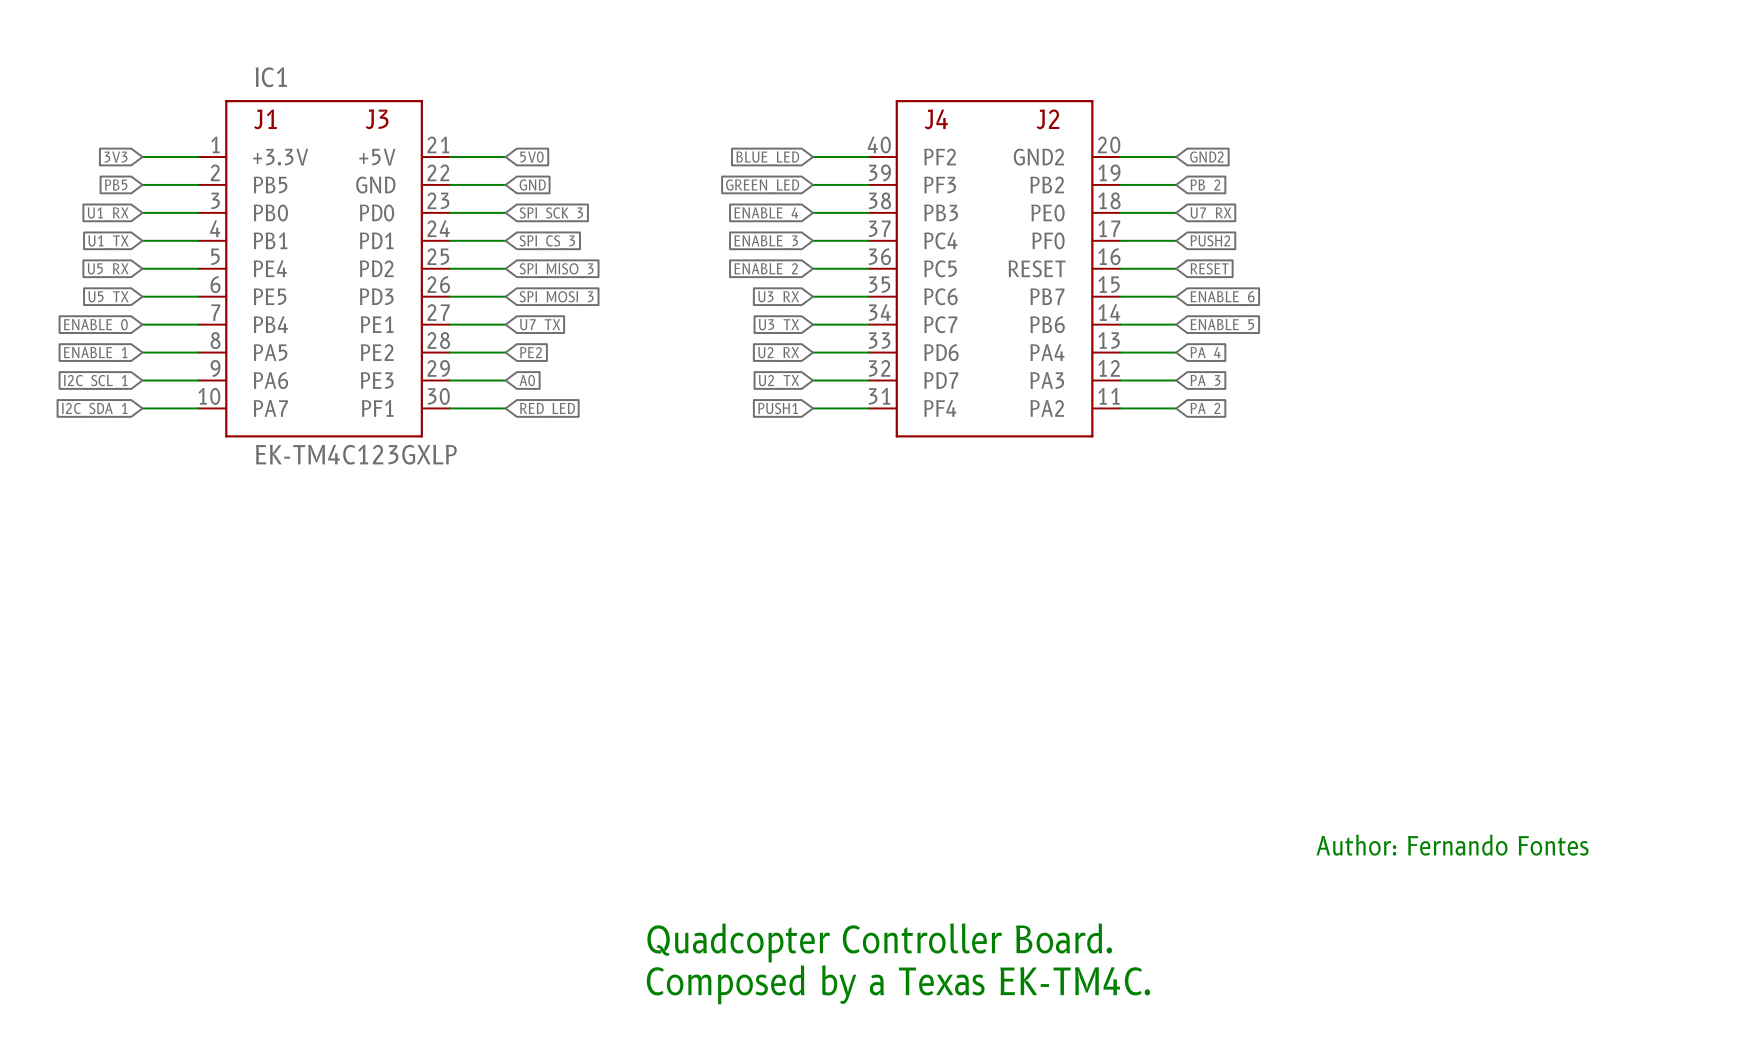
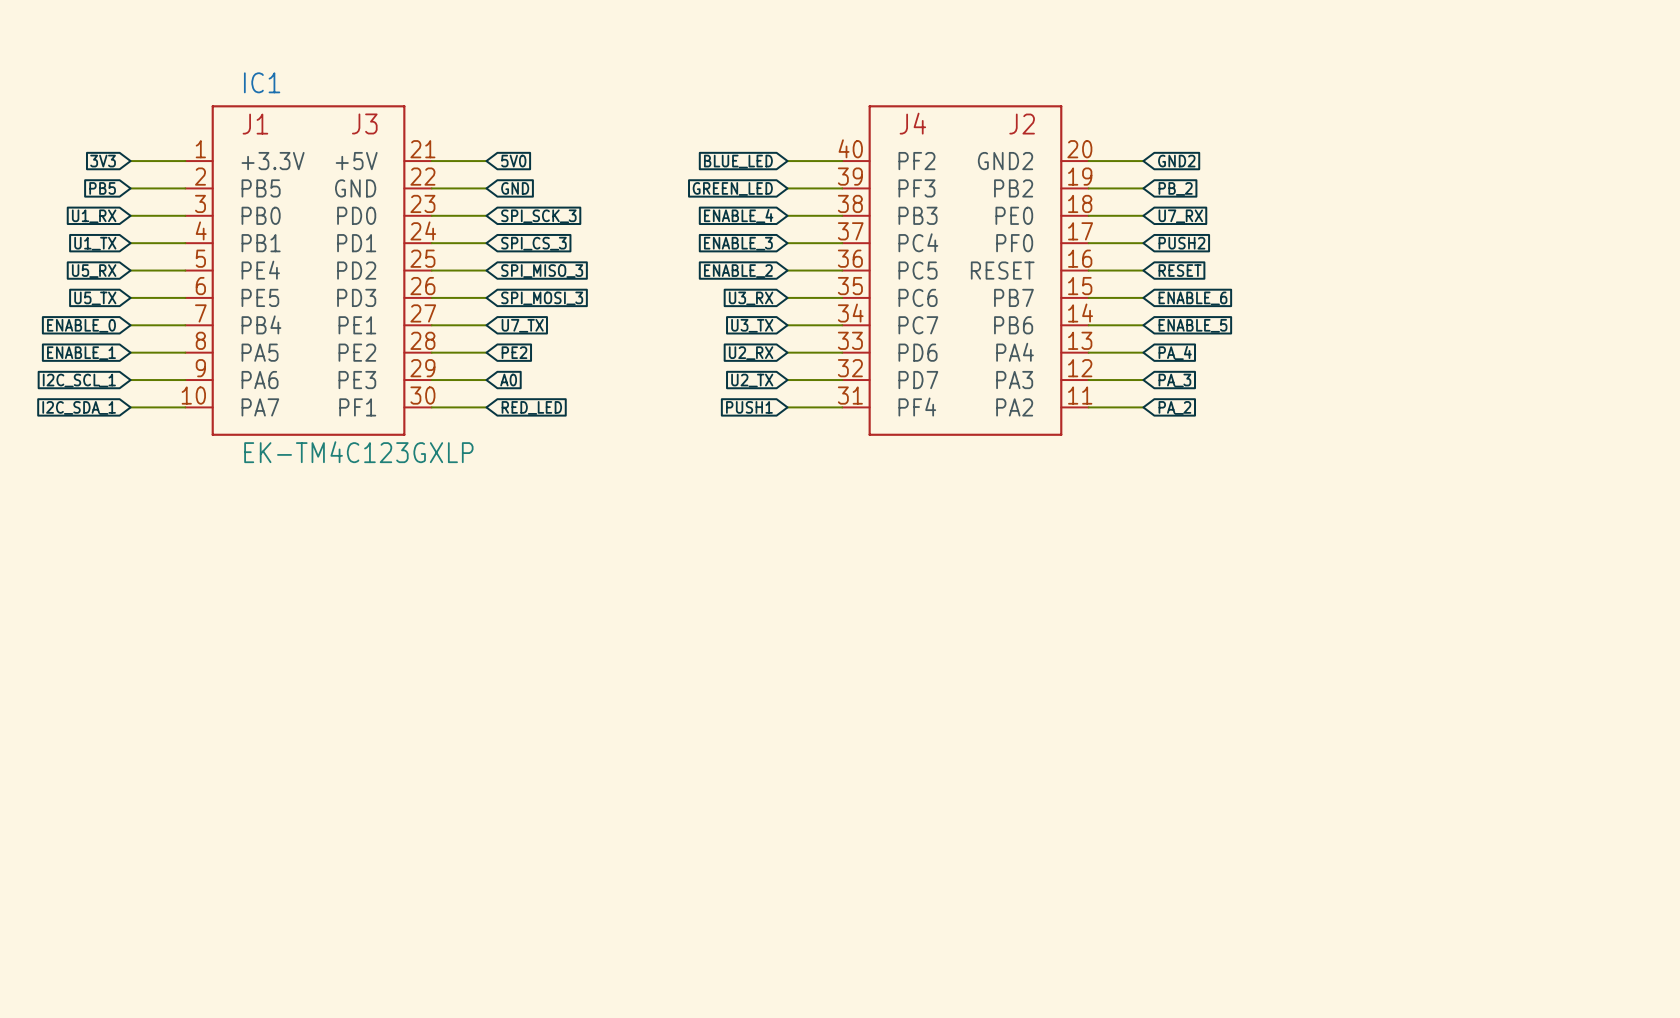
text: Author: Fernando Fontes (1452, 845) -> none
text: Quadcopter Controller Board. (879, 942) -> none
text: Composed by a Texas EK-TM4C. (898, 984) -> none

